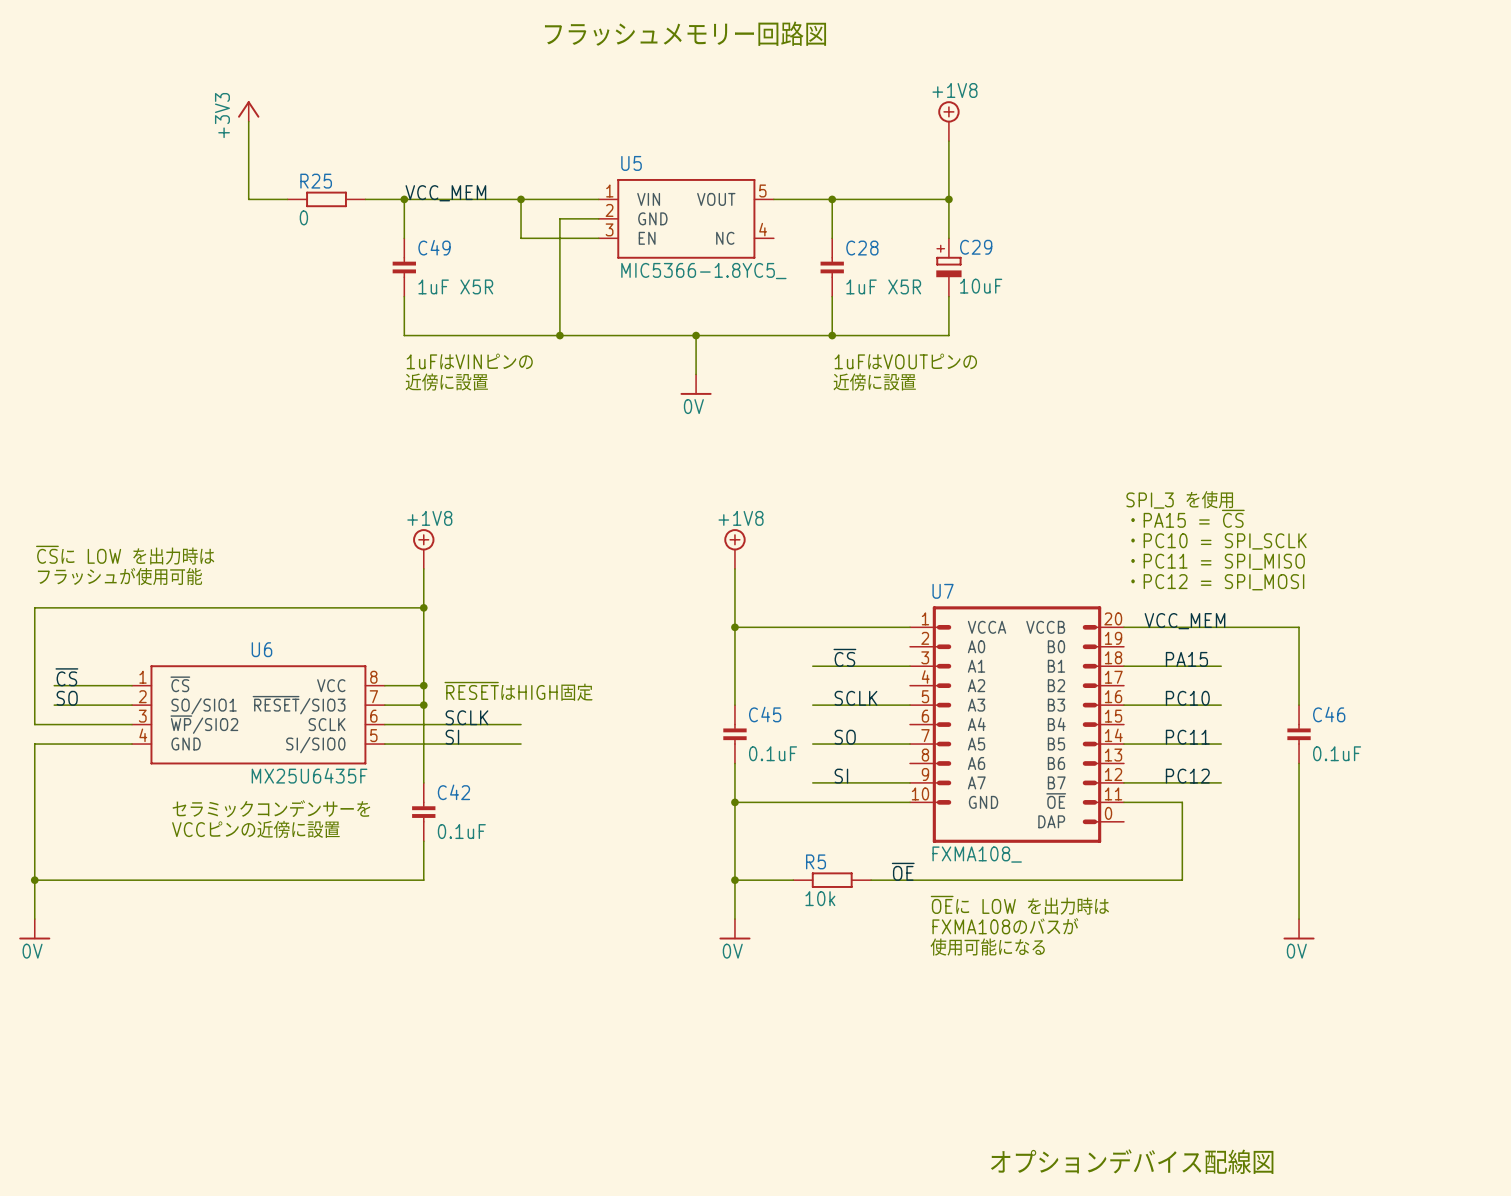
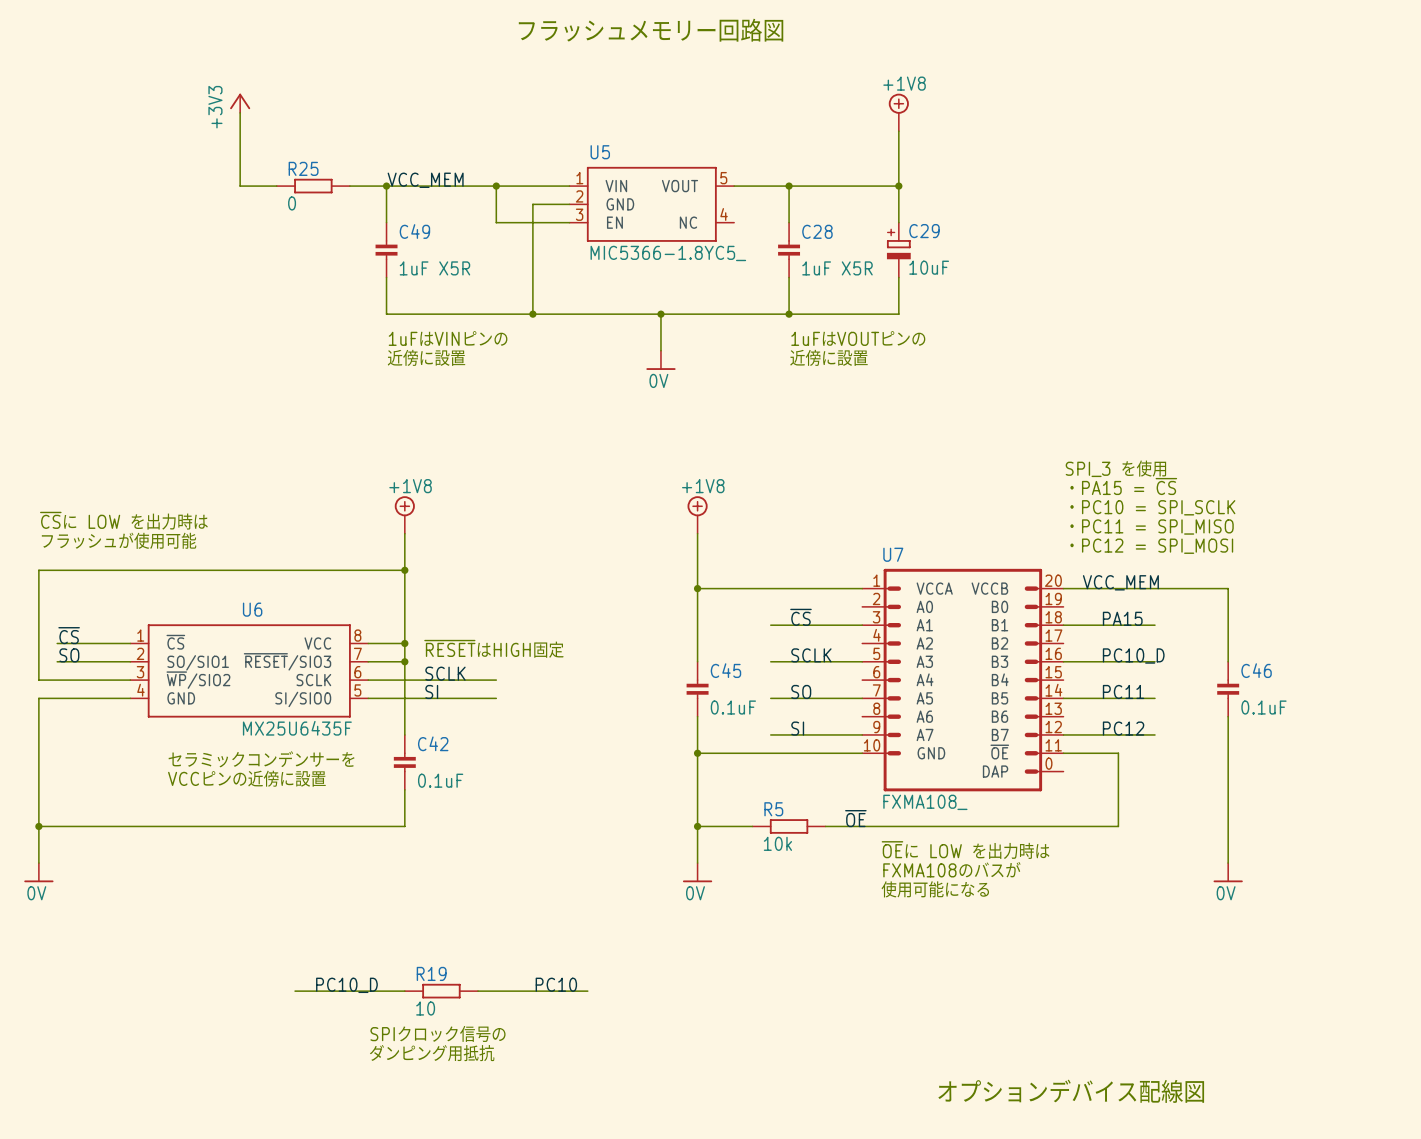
label: PC10 (1187, 698) -> PC10_D (1133, 655)
label: none -> PC10 (556, 984)
label: none -> PC10_D (346, 985)
wire: none -> (295, 991) (404, 991)
R19: none -> 10 (441, 991)
wire: none -> (478, 991) (587, 991)
text: none -> SPIクロック信号の (438, 1033)
text: none -> ダンピング用抵抗 (432, 1053)

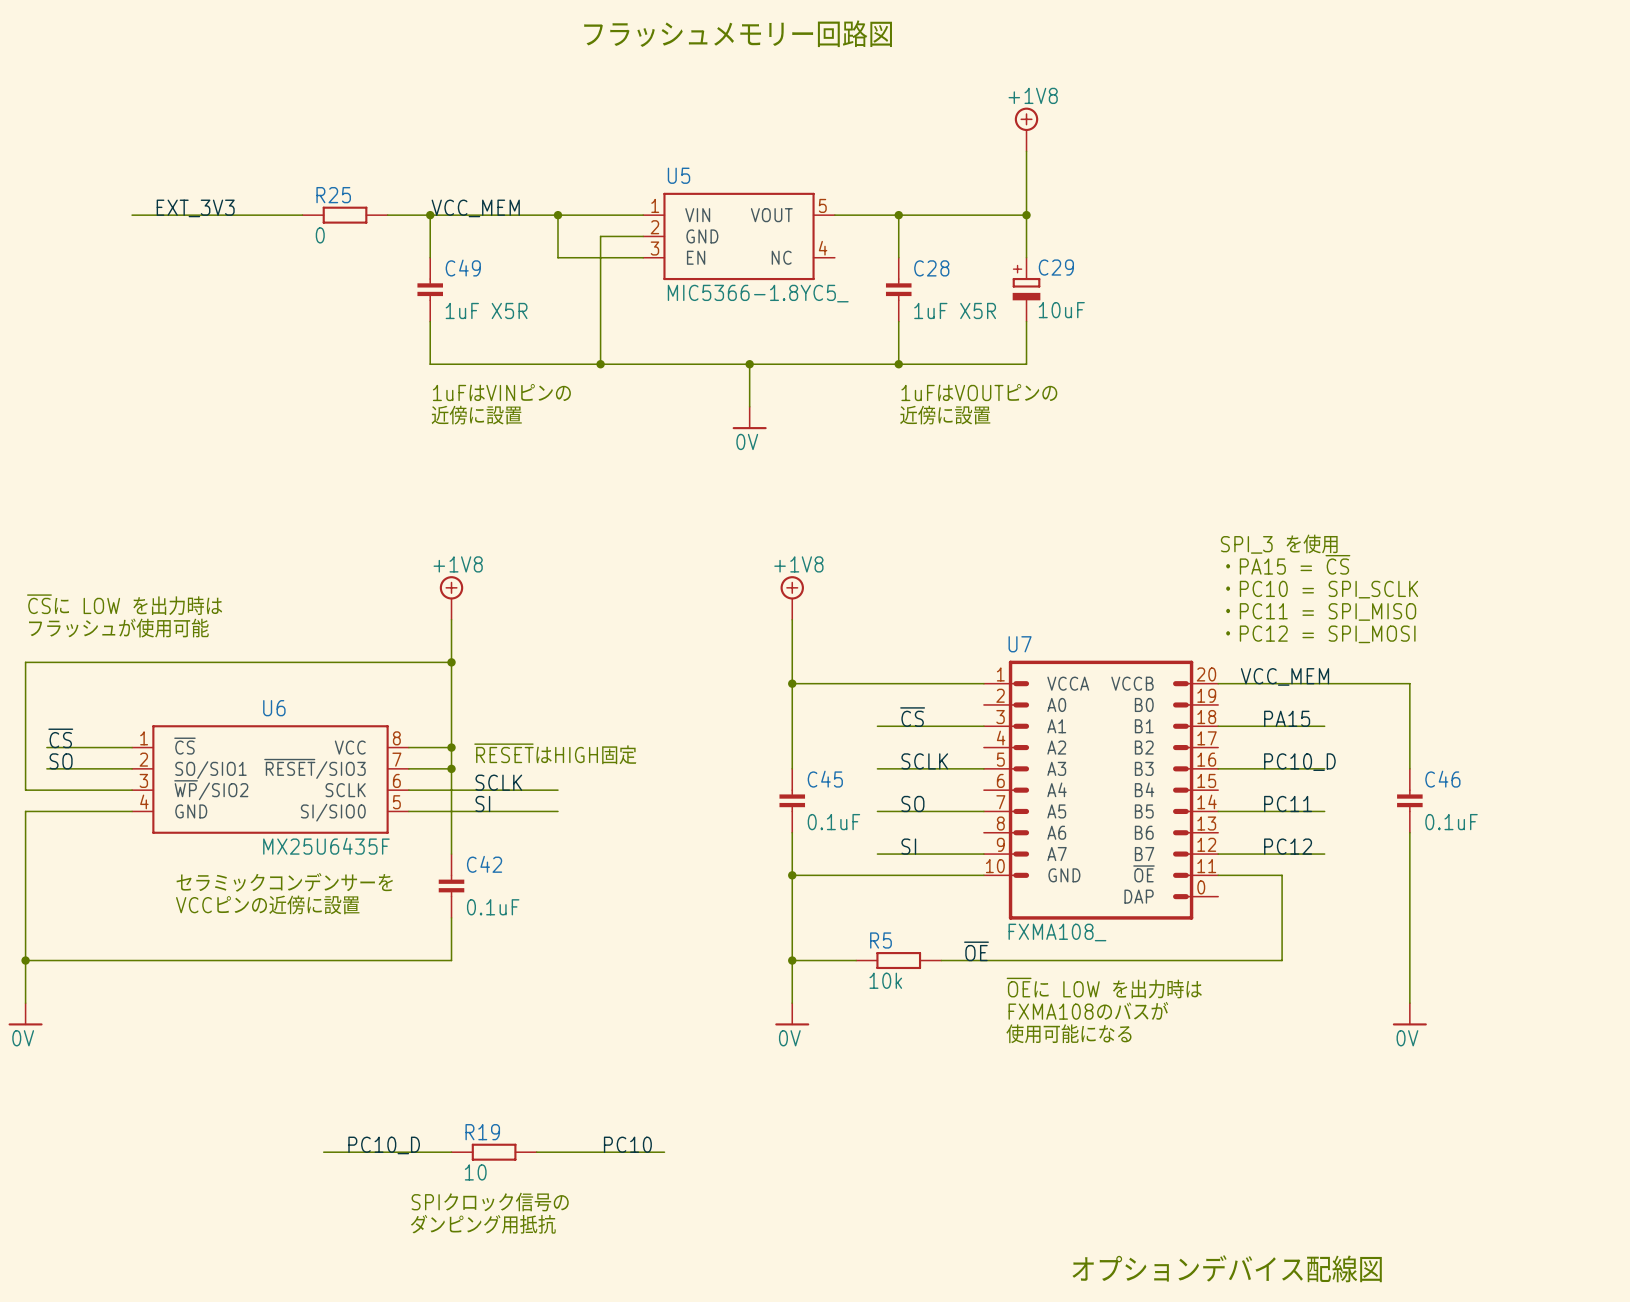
power symbol: +3V3 (240, 103) -> none
wire: (240, 112) (240, 186) -> (132, 215) (259, 215)
label: none -> EXT_3V3 (195, 208)

